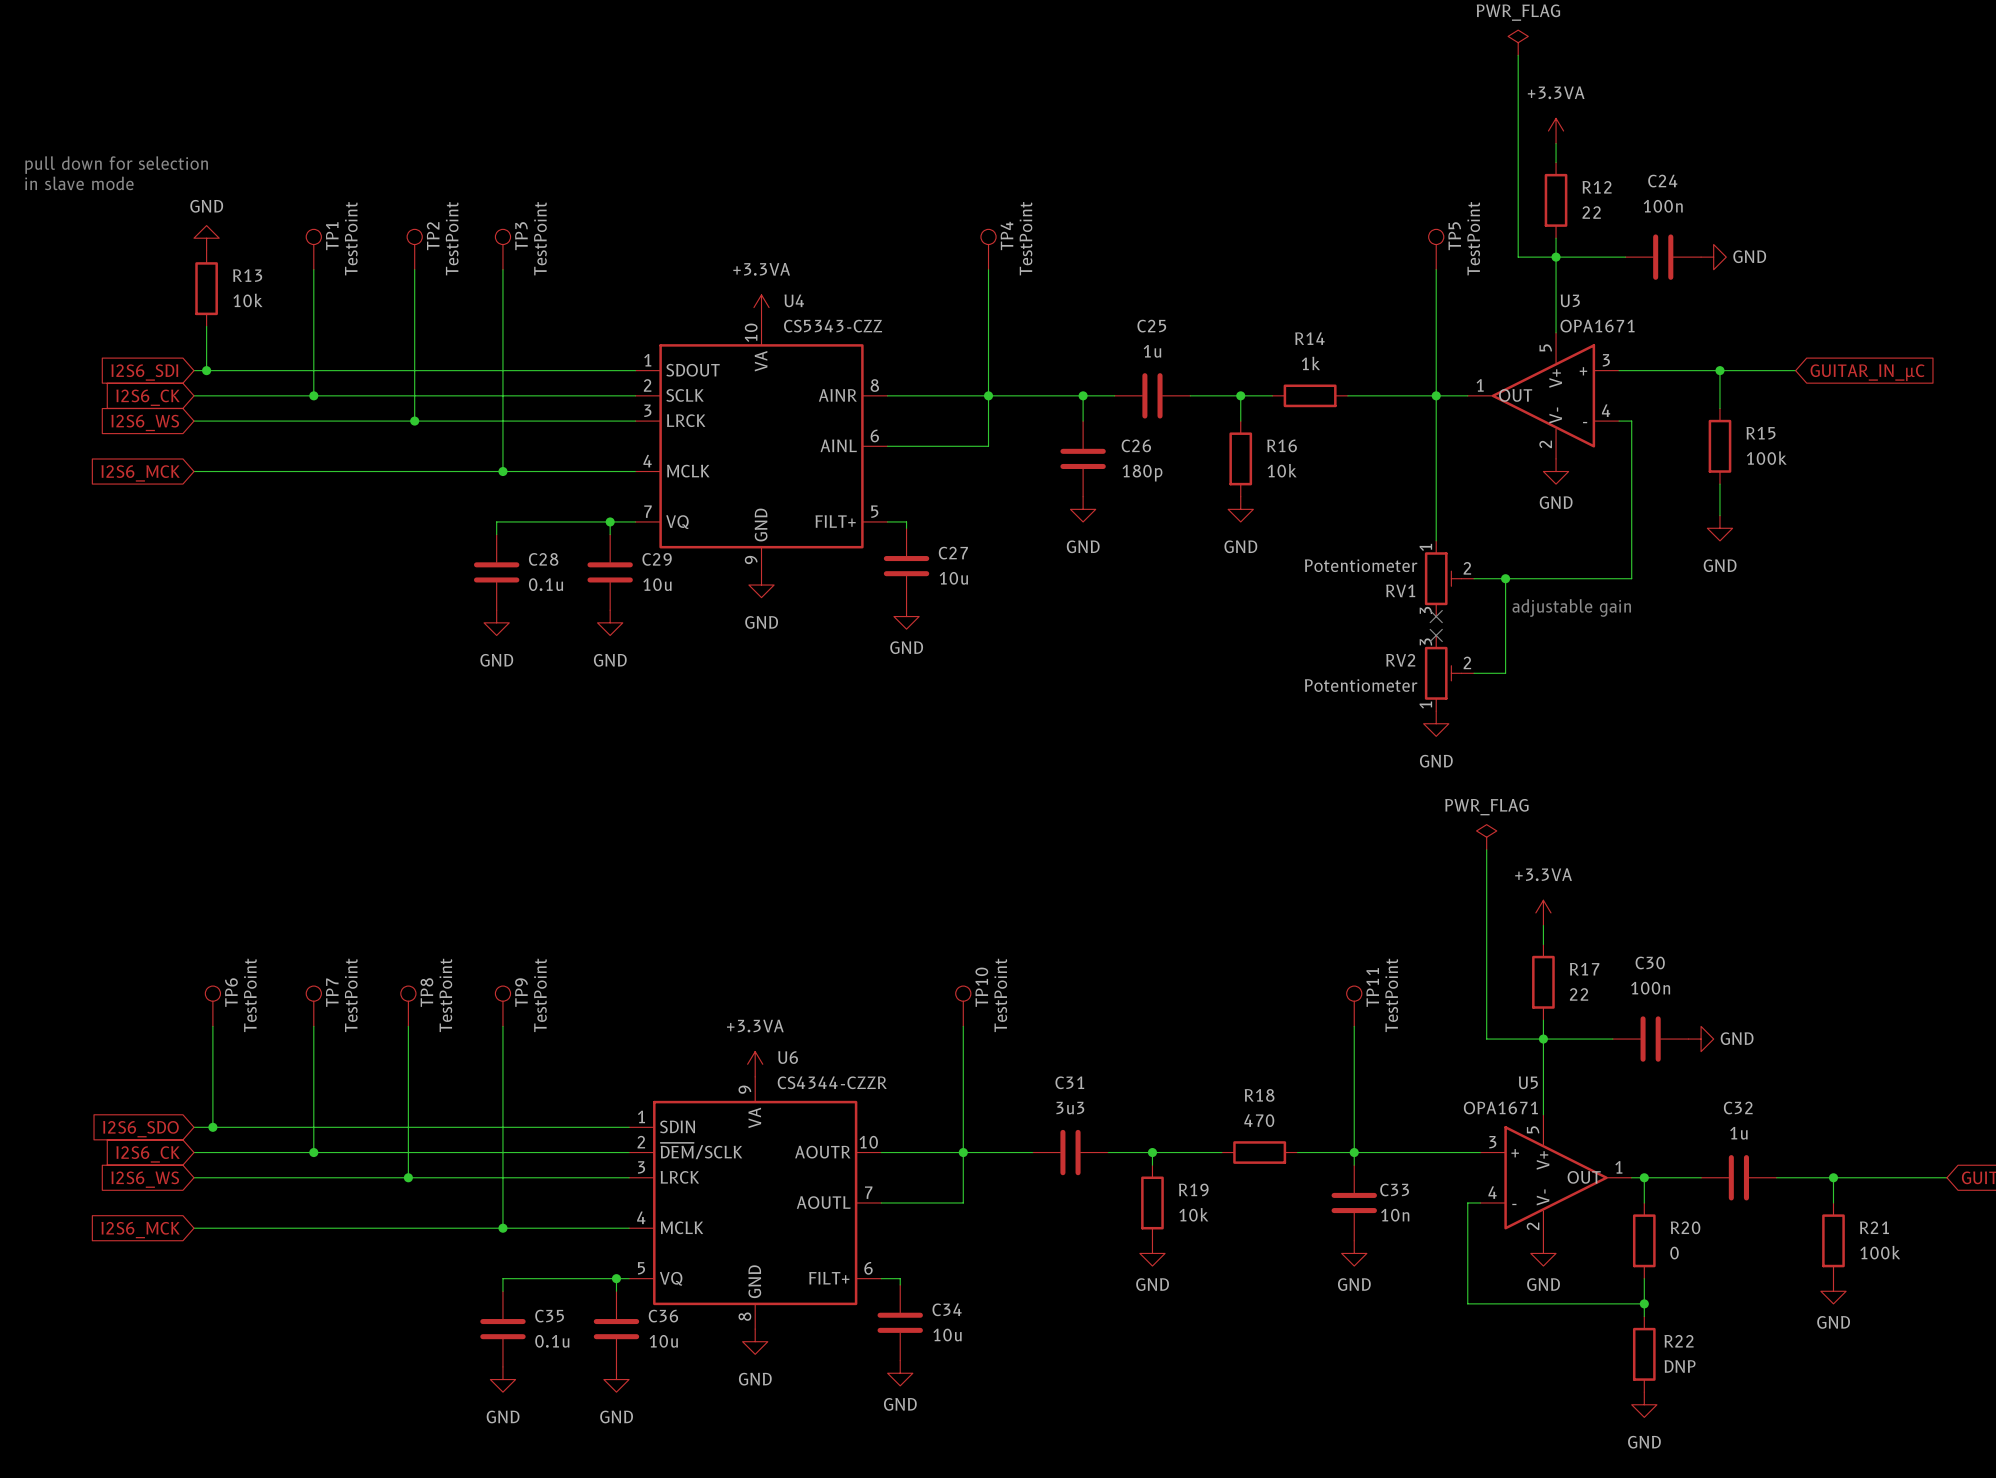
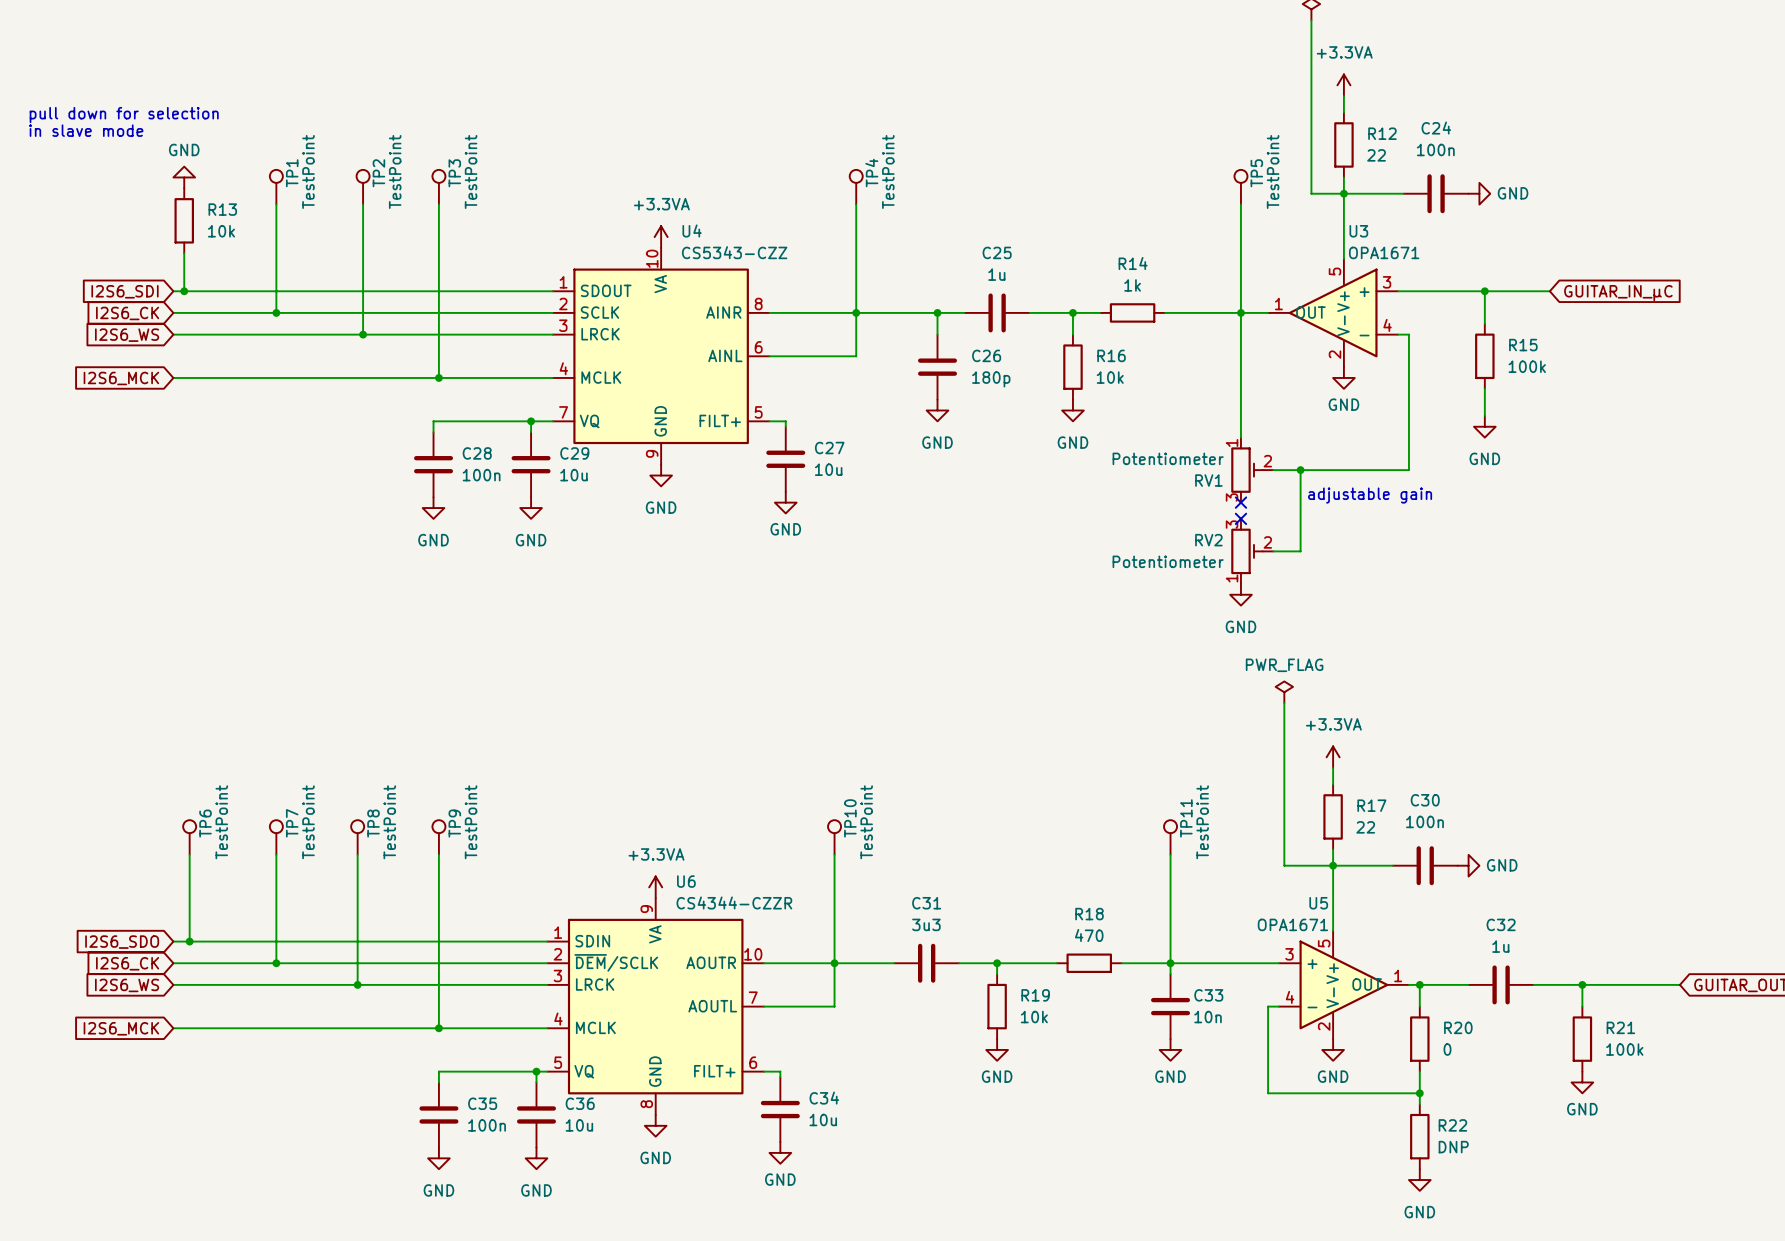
C28 value: 0.1u (545, 584) -> 100n (481, 475)
C35 value: 0.1u (552, 1341) -> 100n (487, 1125)

